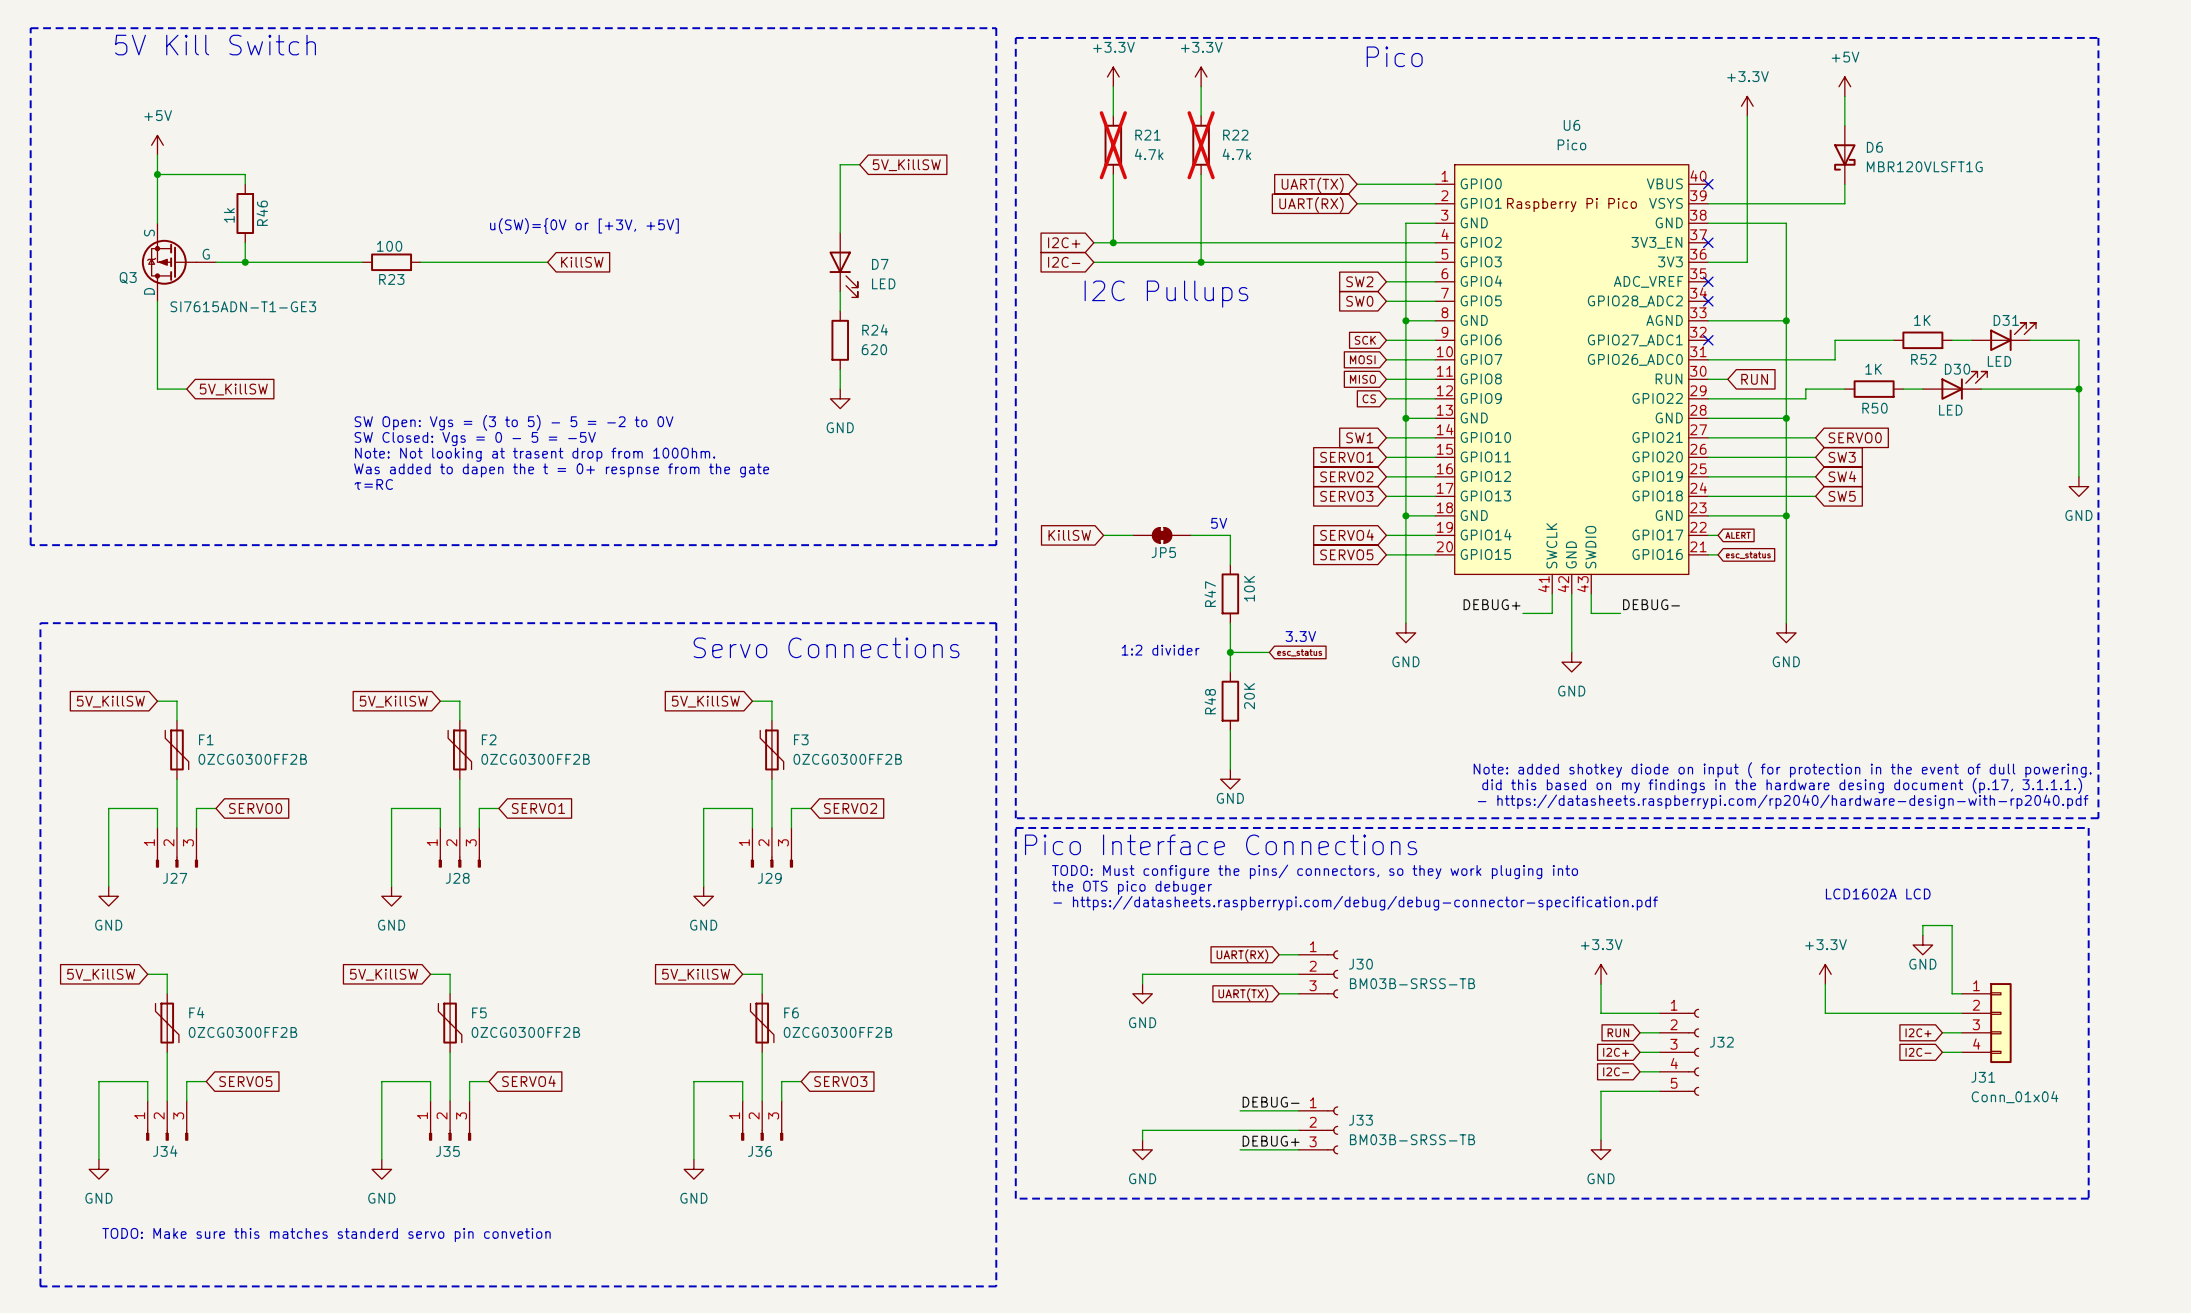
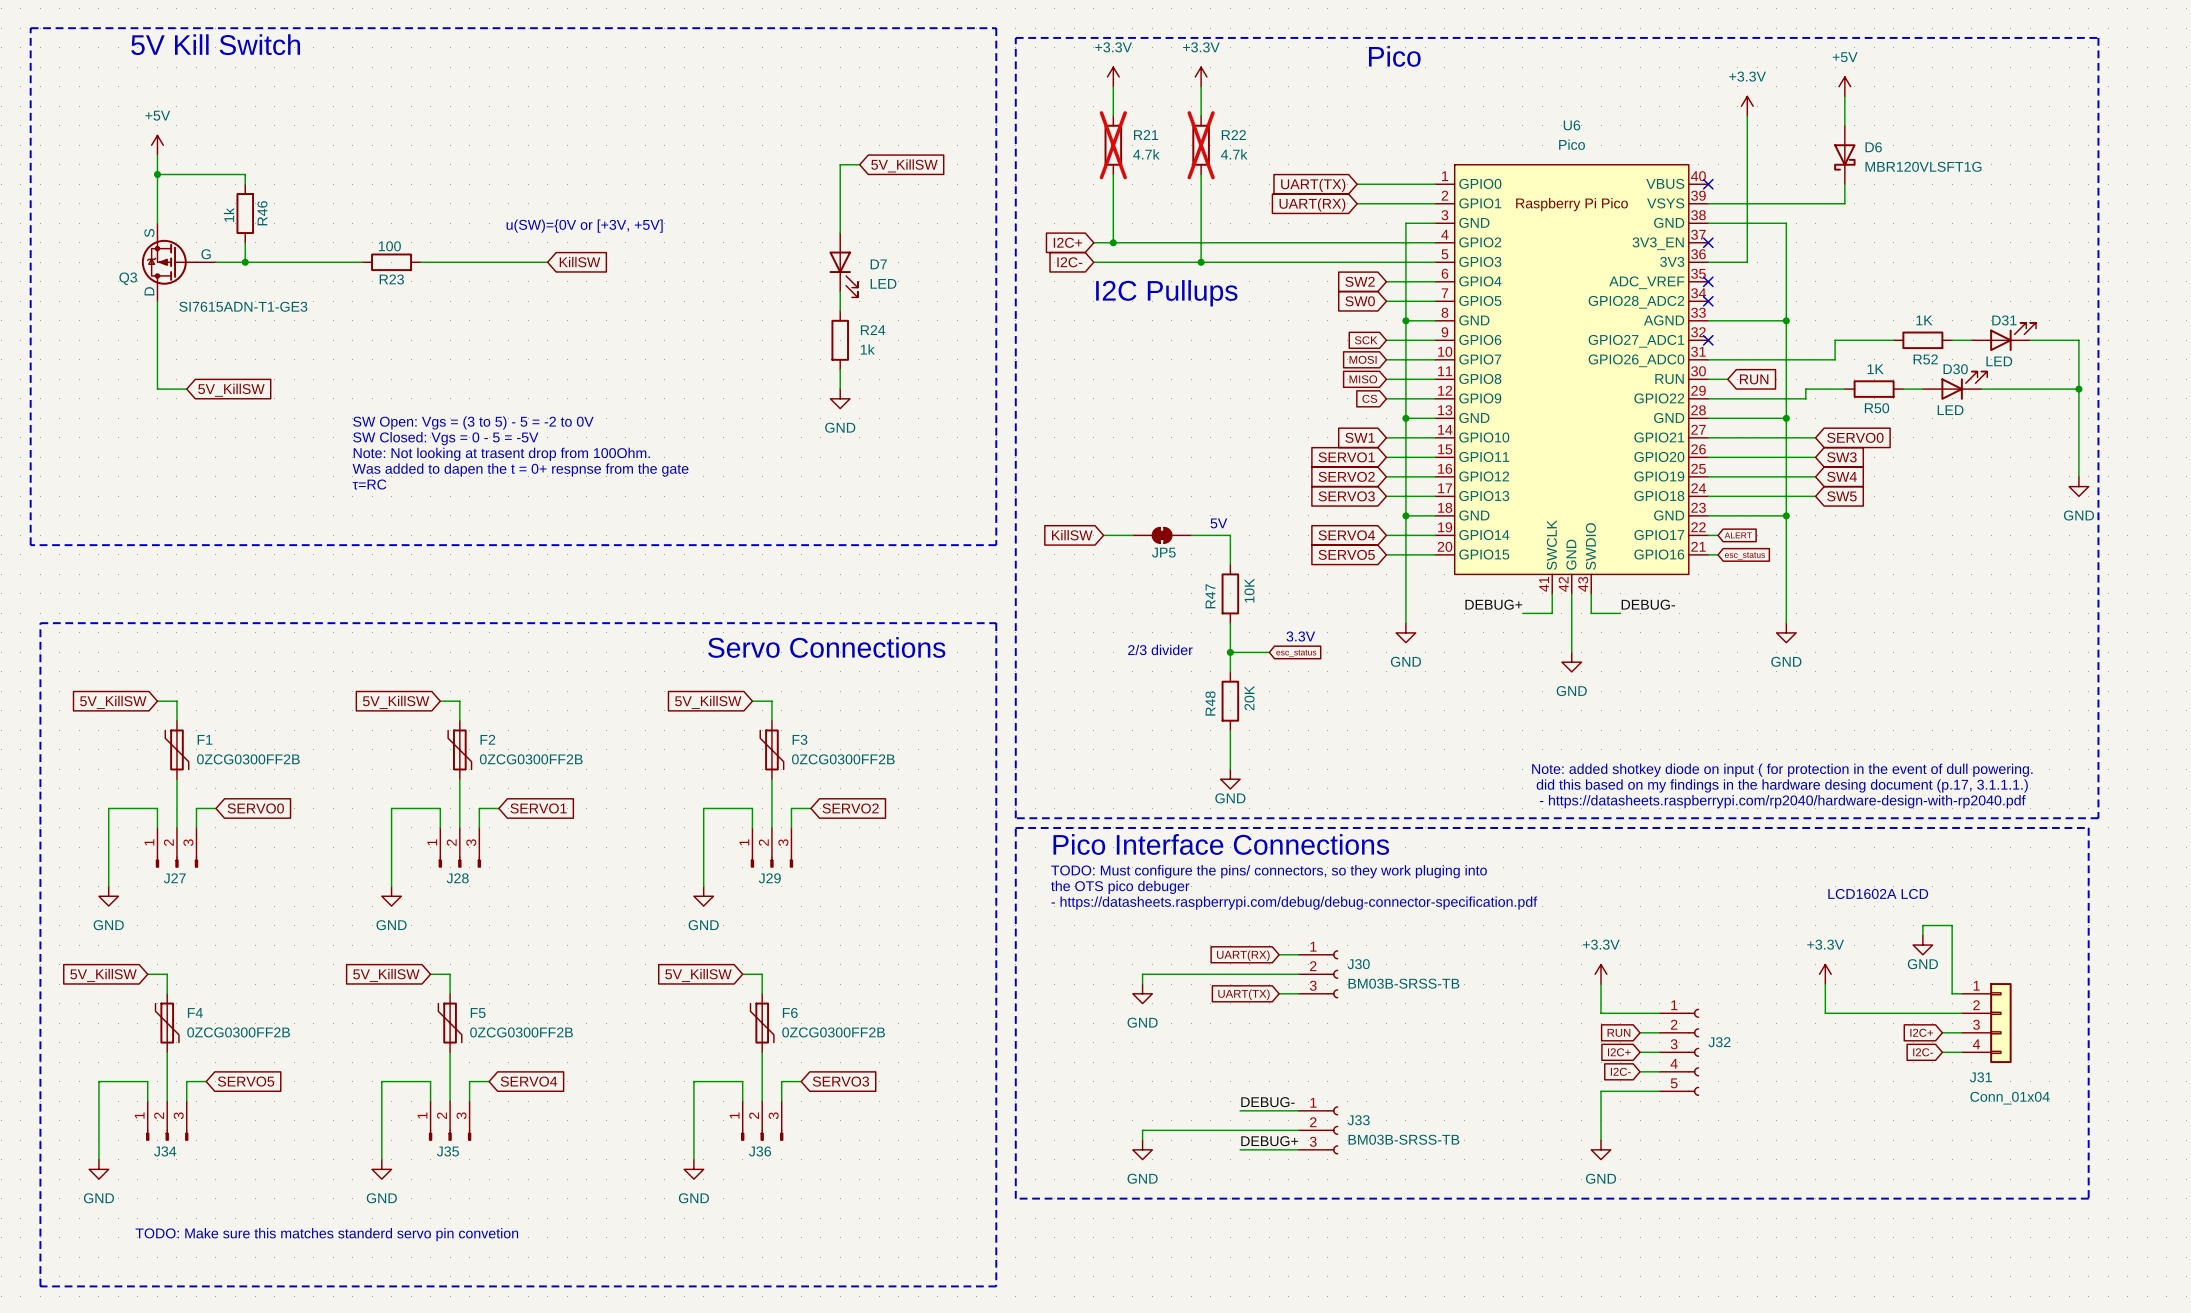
R24 value: 620 (874, 349) -> 1k (867, 349)
text: 1:2 divider (1160, 650) -> 2/3 divider (1160, 649)

